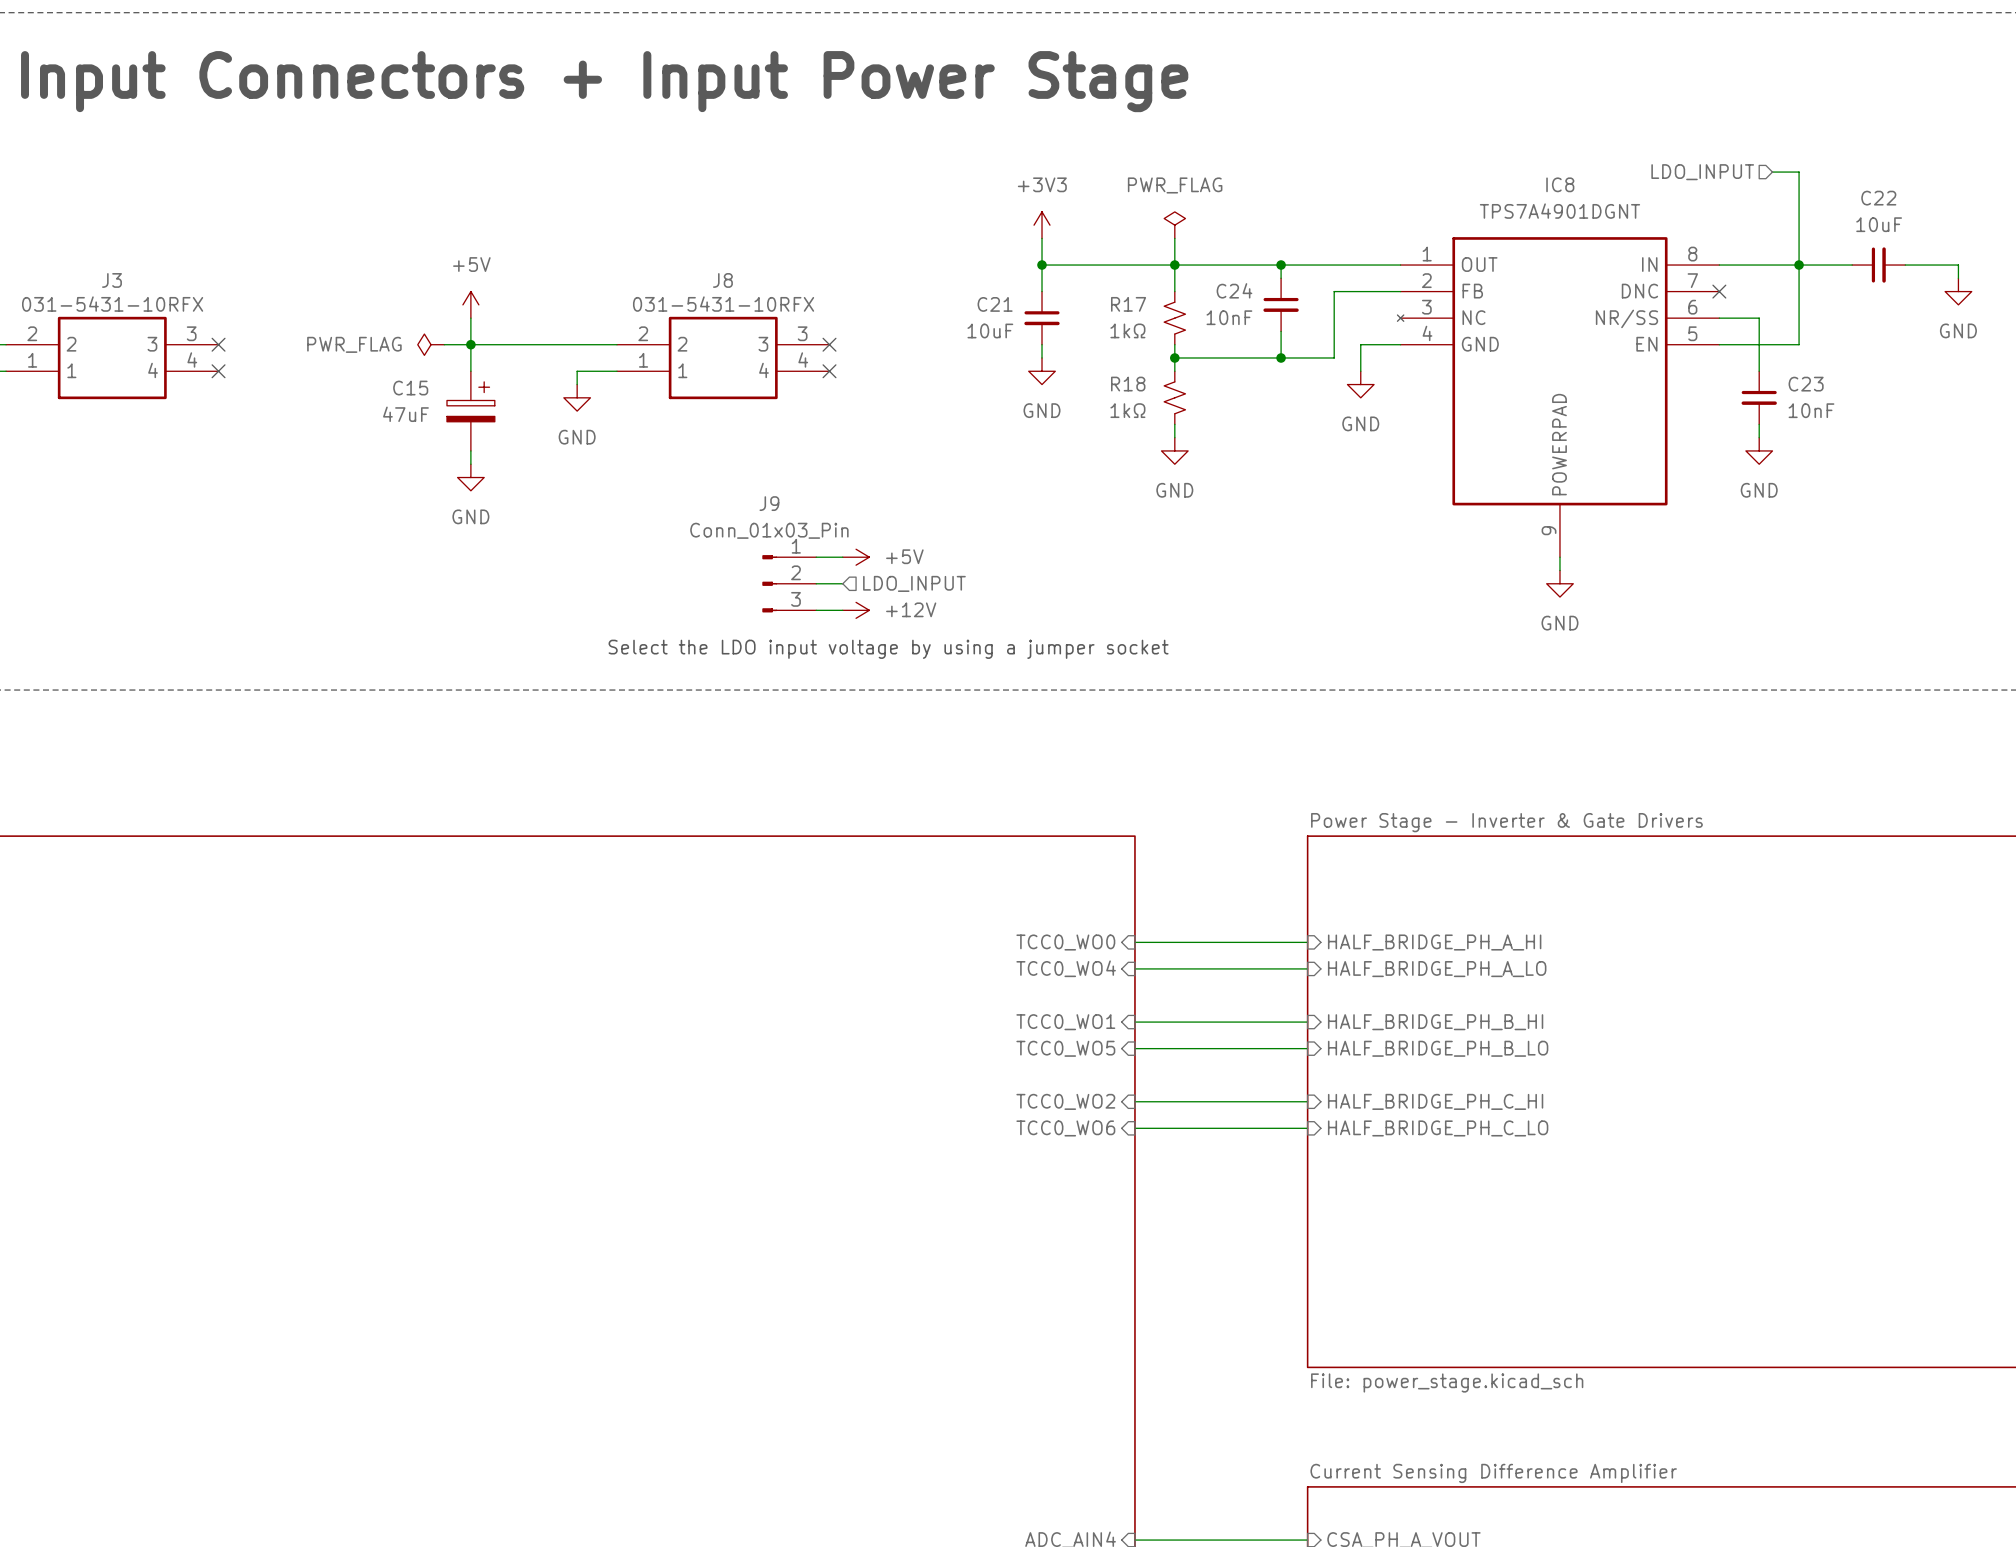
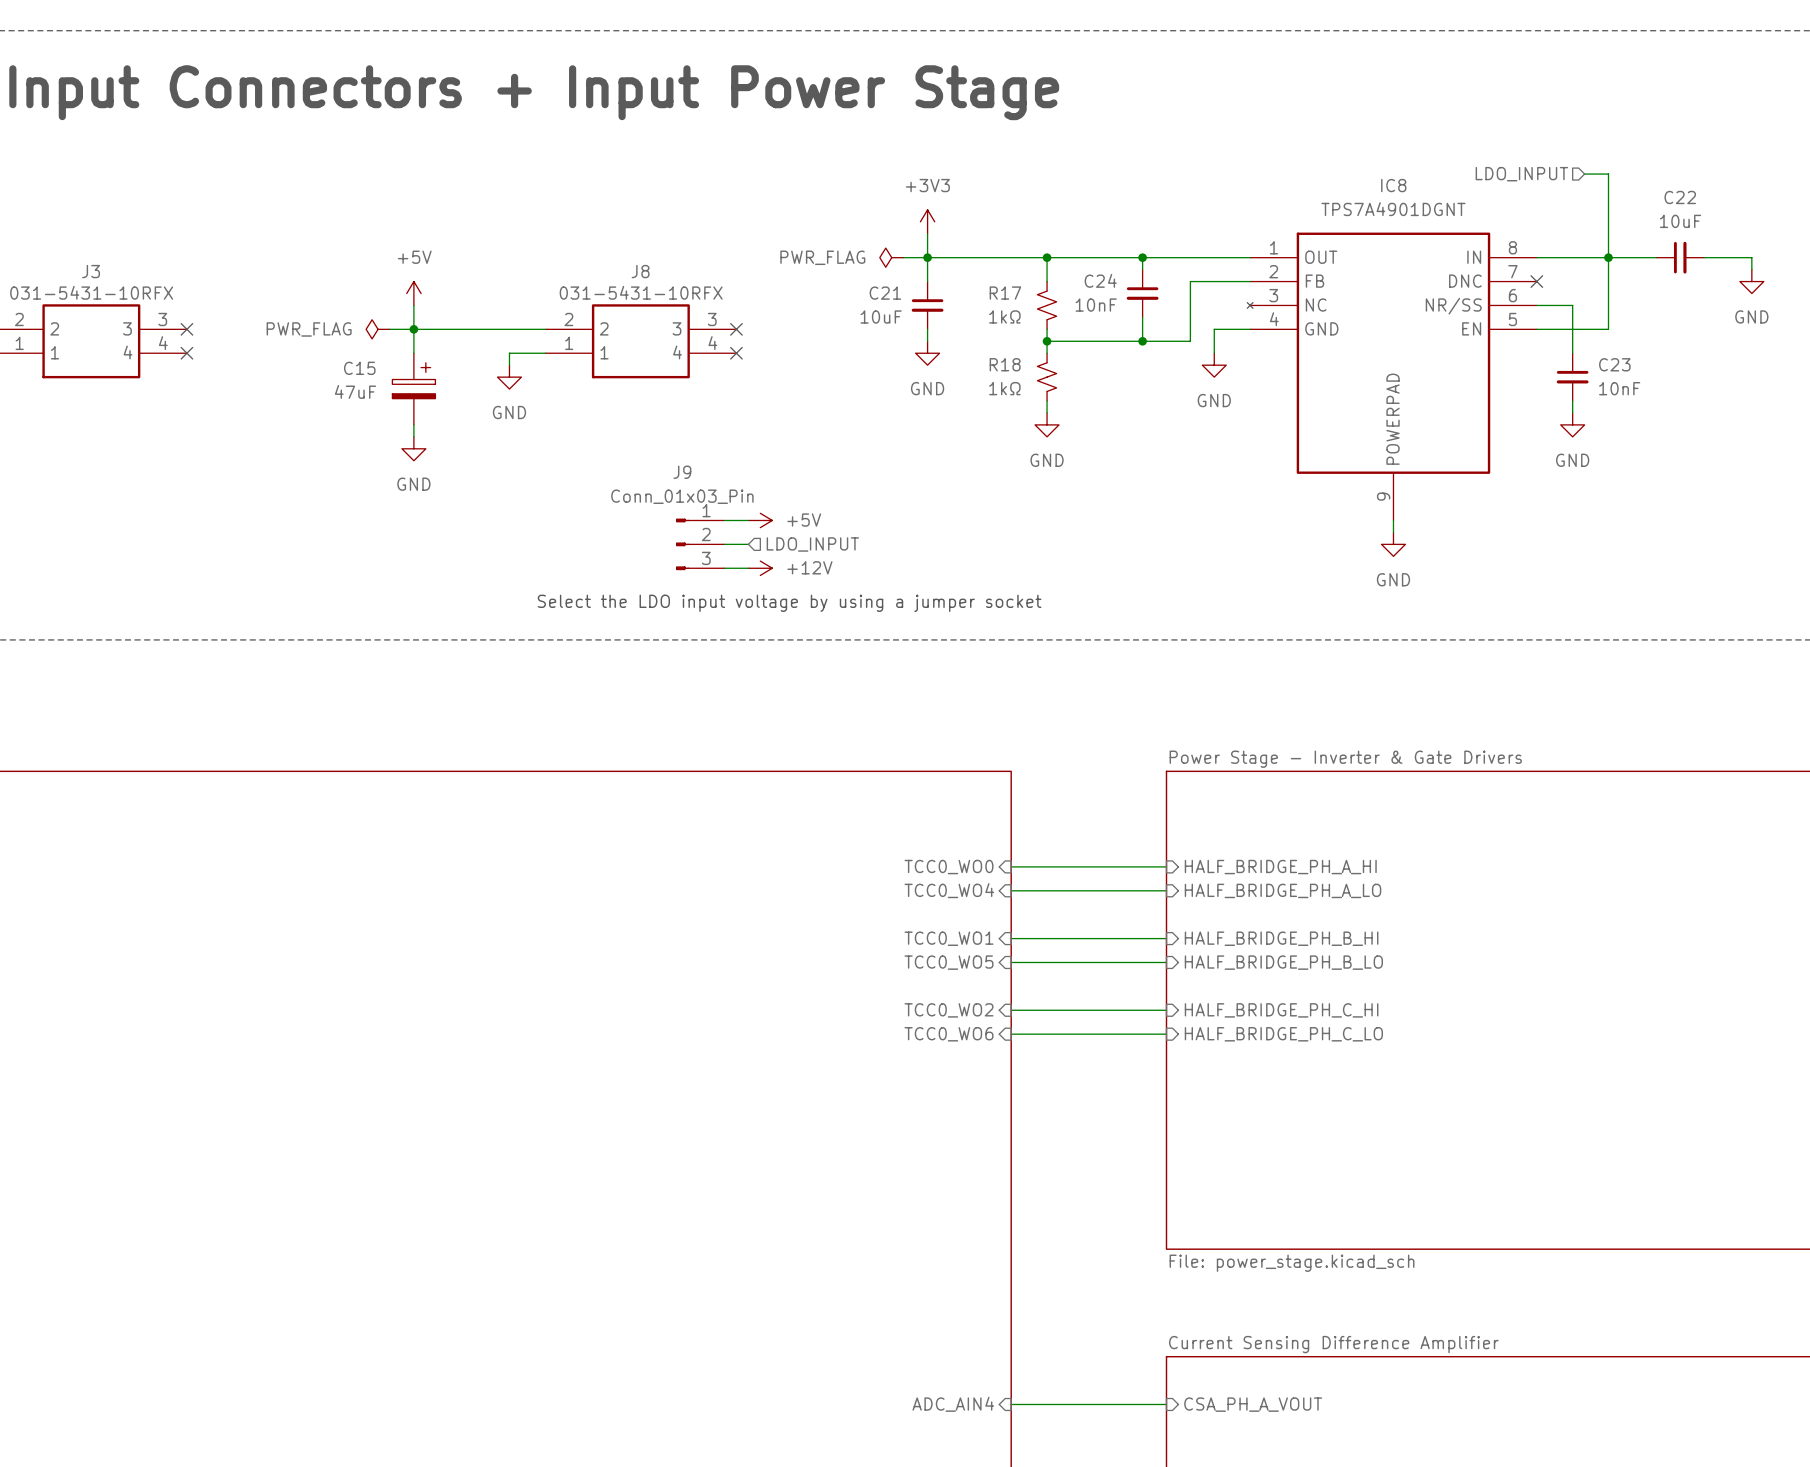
power symbol text position: PWR_FLAG (1175, 185) -> PWR_FLAG (822, 257)
power symbol rotation: 0° (1174, 225) -> 90° counterclockwise (891, 257)
power symbol position: PWR_FLAG (1174, 225) -> PWR_FLAG (891, 257)
wire: (1174, 238) (1174, 265) -> none
wire: none -> (903, 257) (927, 257)

